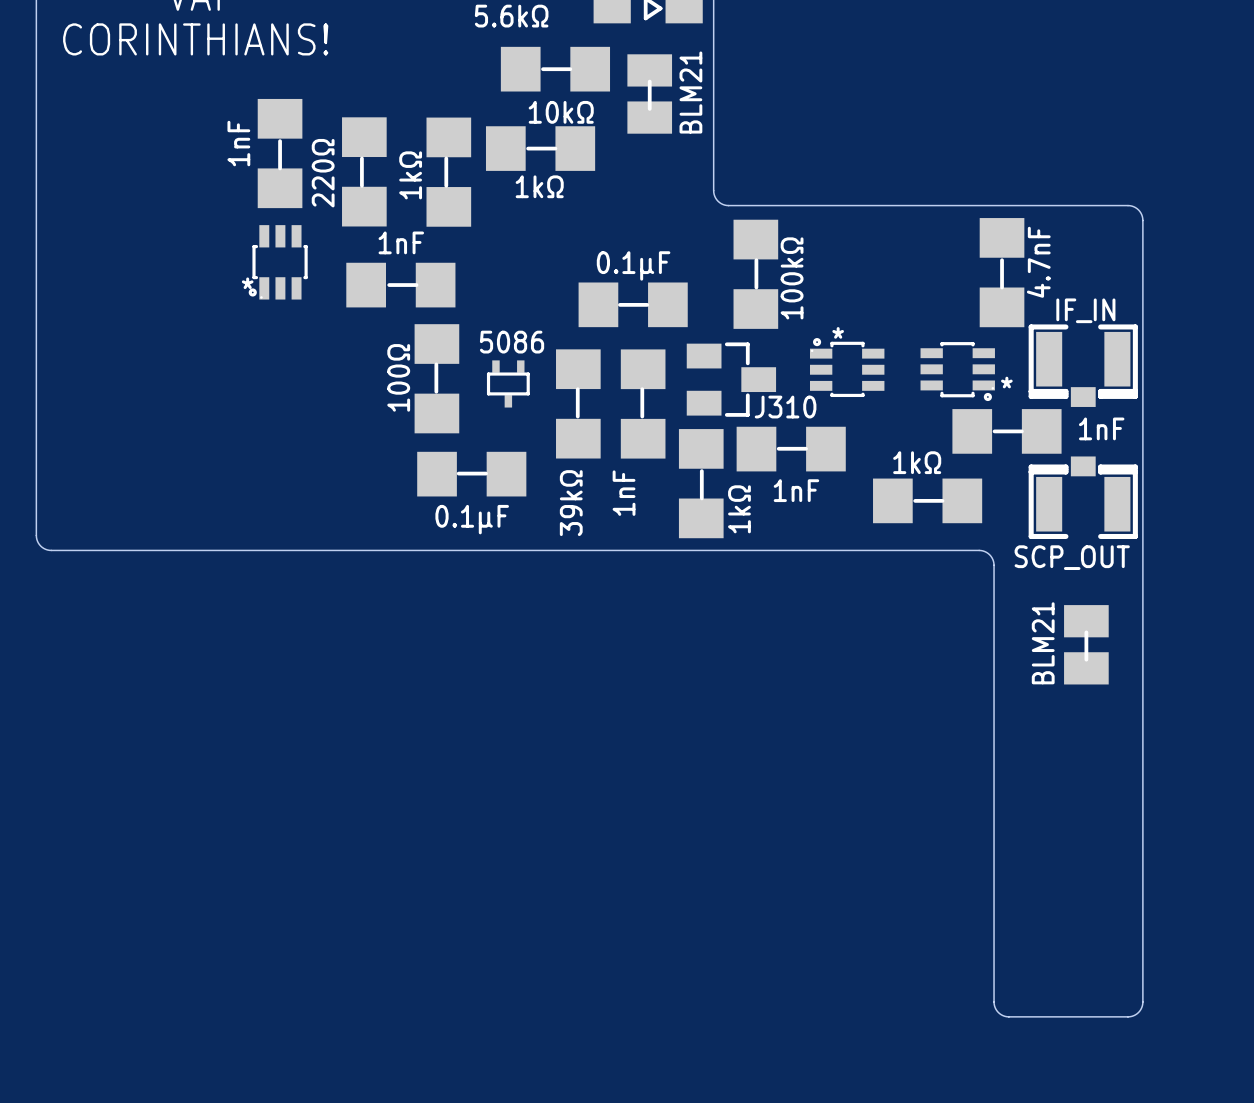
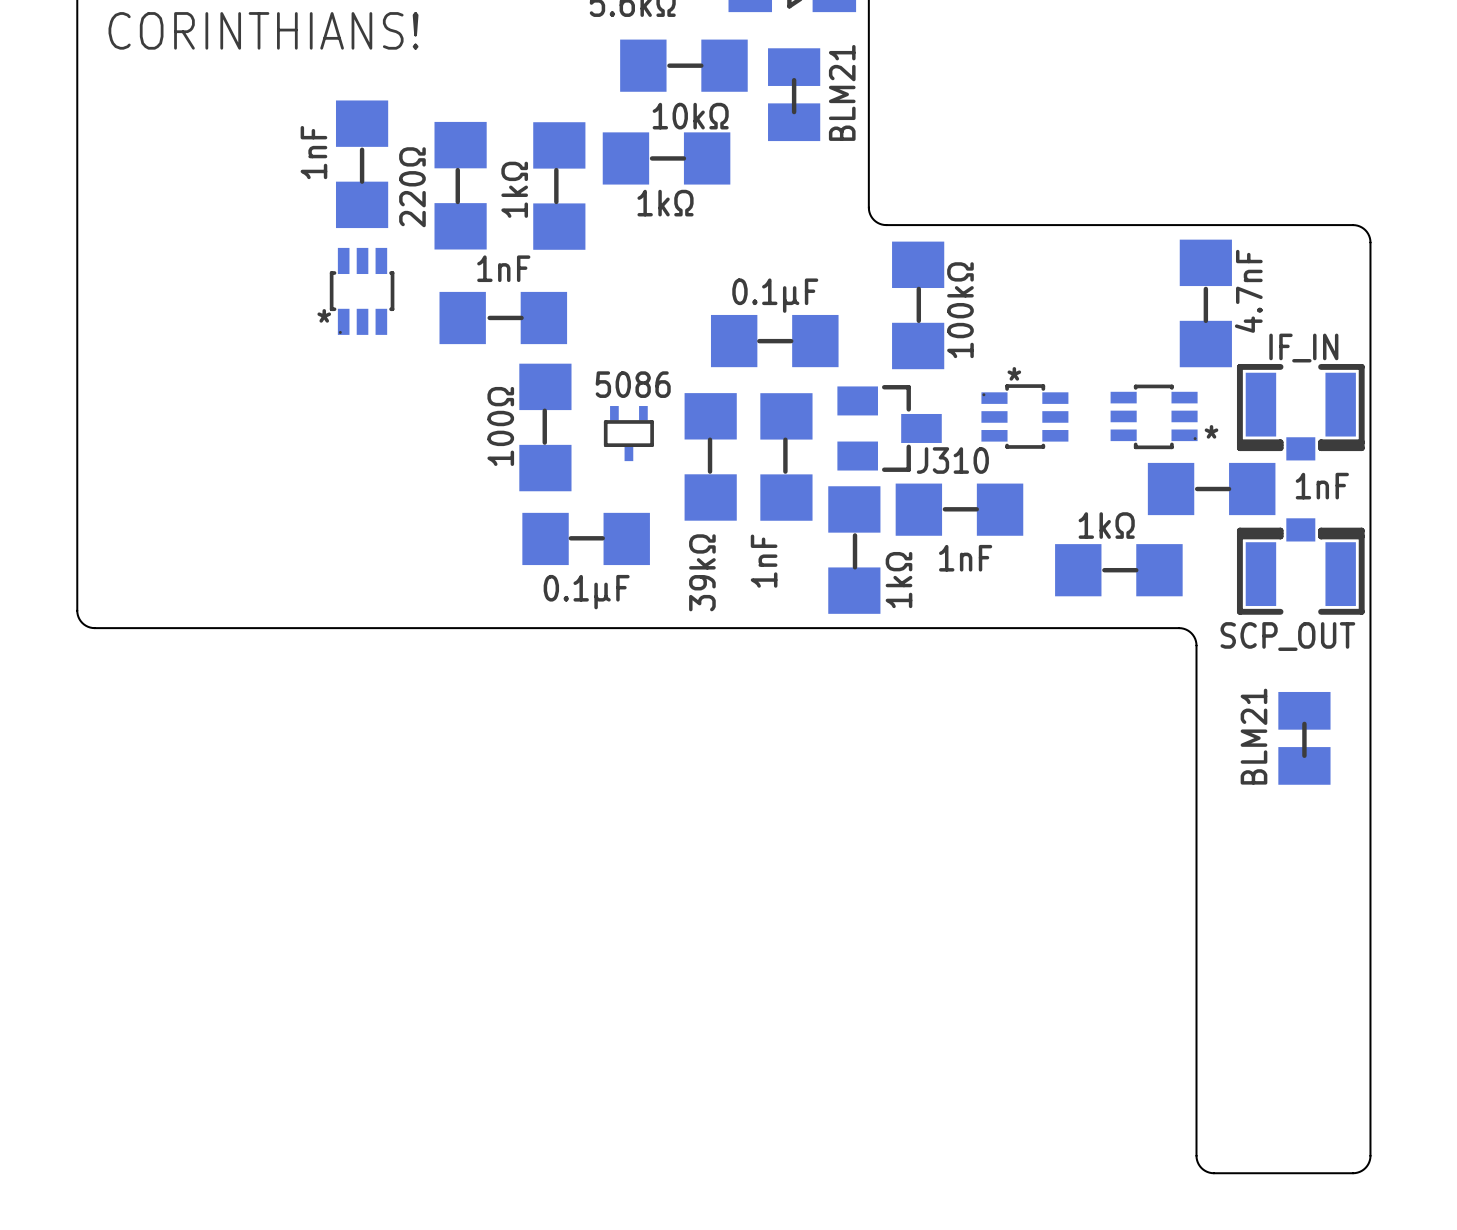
part footprint: [248, 225, 308, 300] -> [329, 247, 395, 335]
part footprint: [810, 338, 885, 398] -> [981, 384, 1069, 449]
part footprint: [920, 342, 995, 402] -> [1110, 384, 1198, 450]

